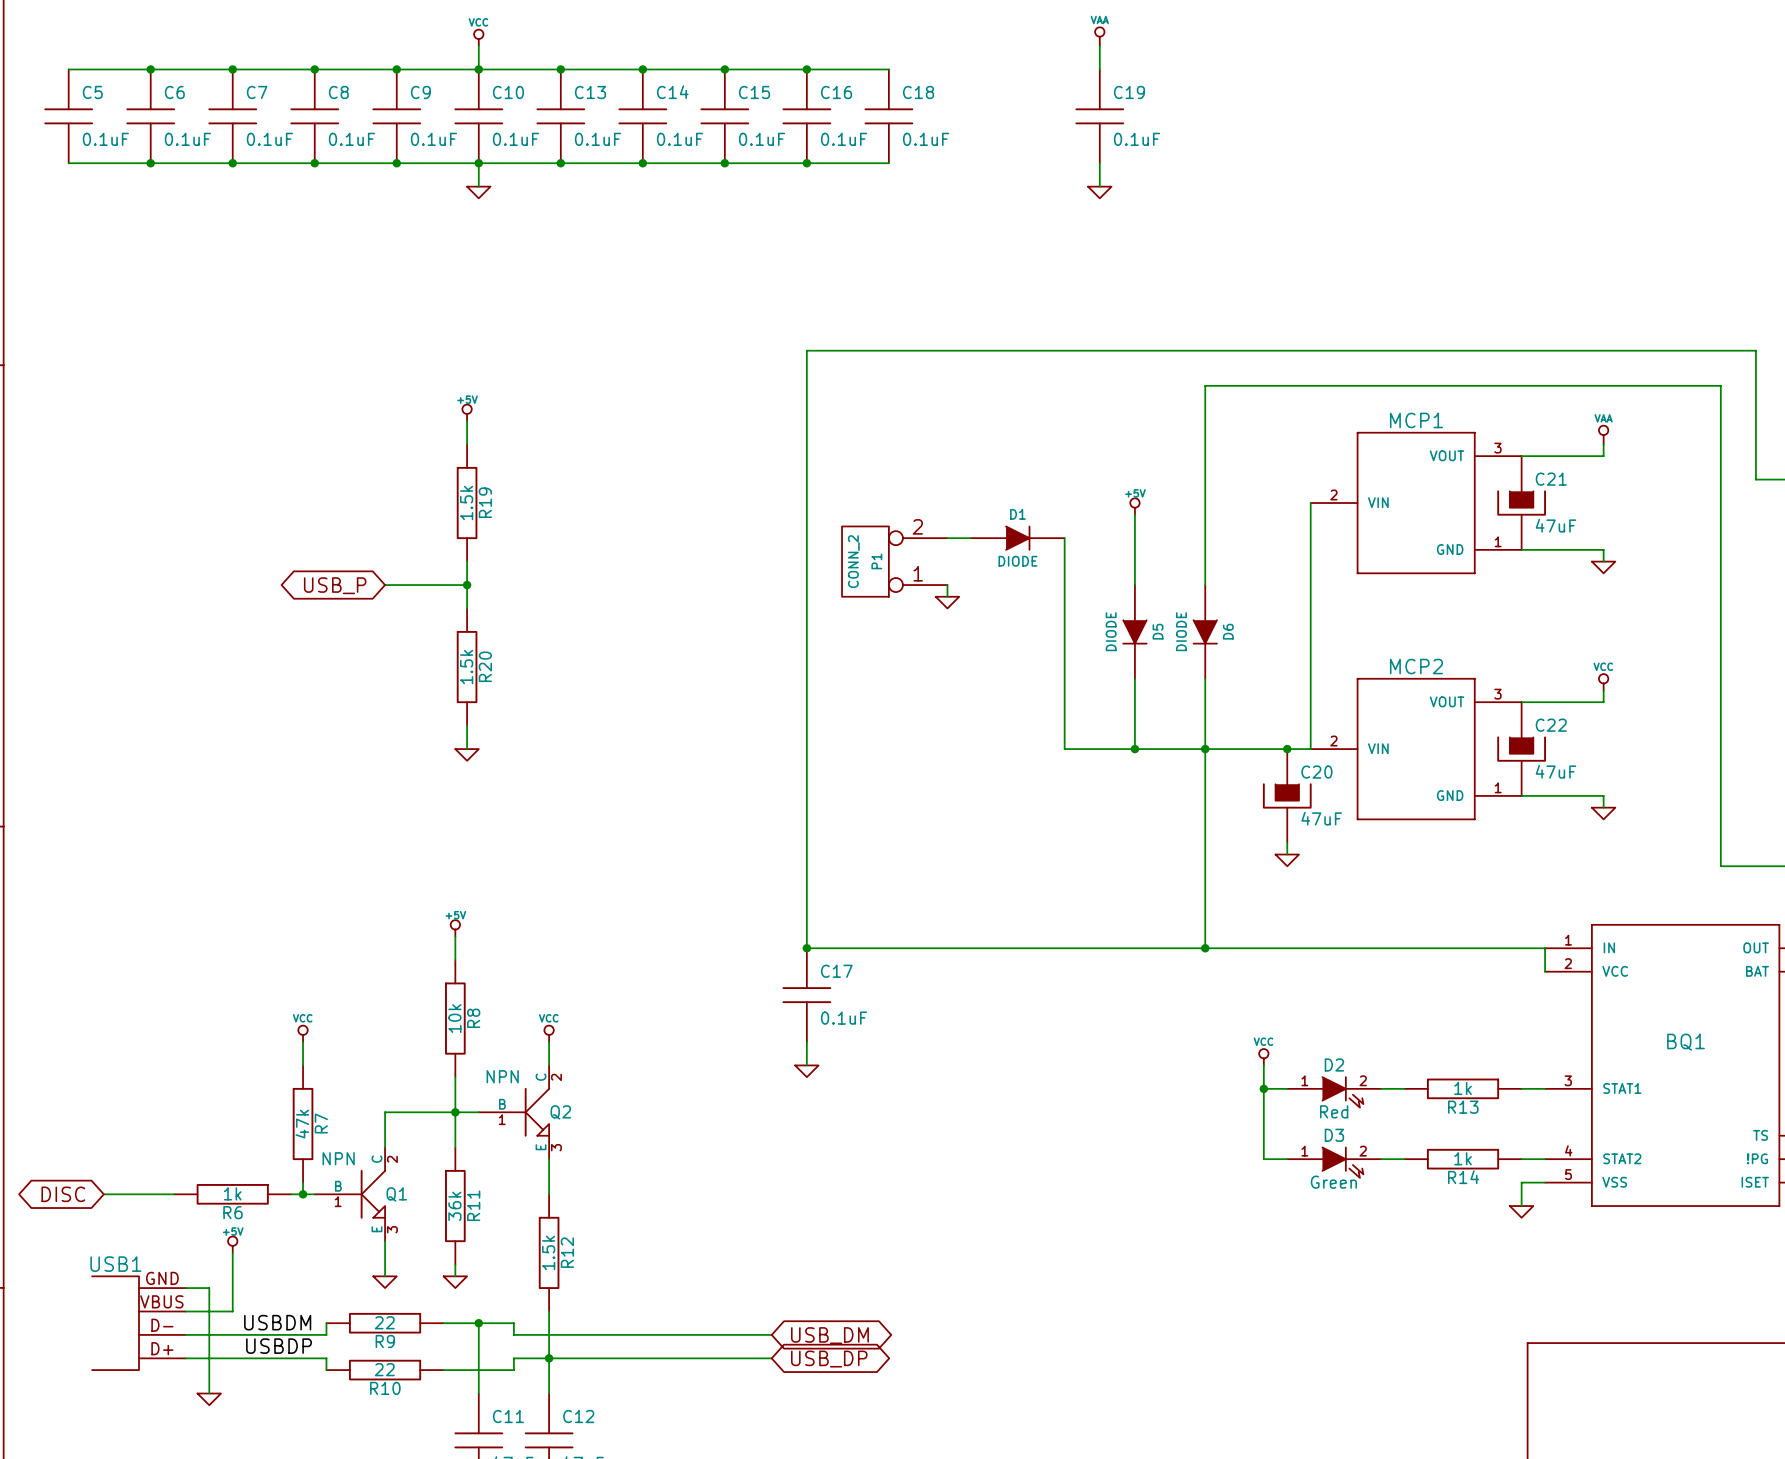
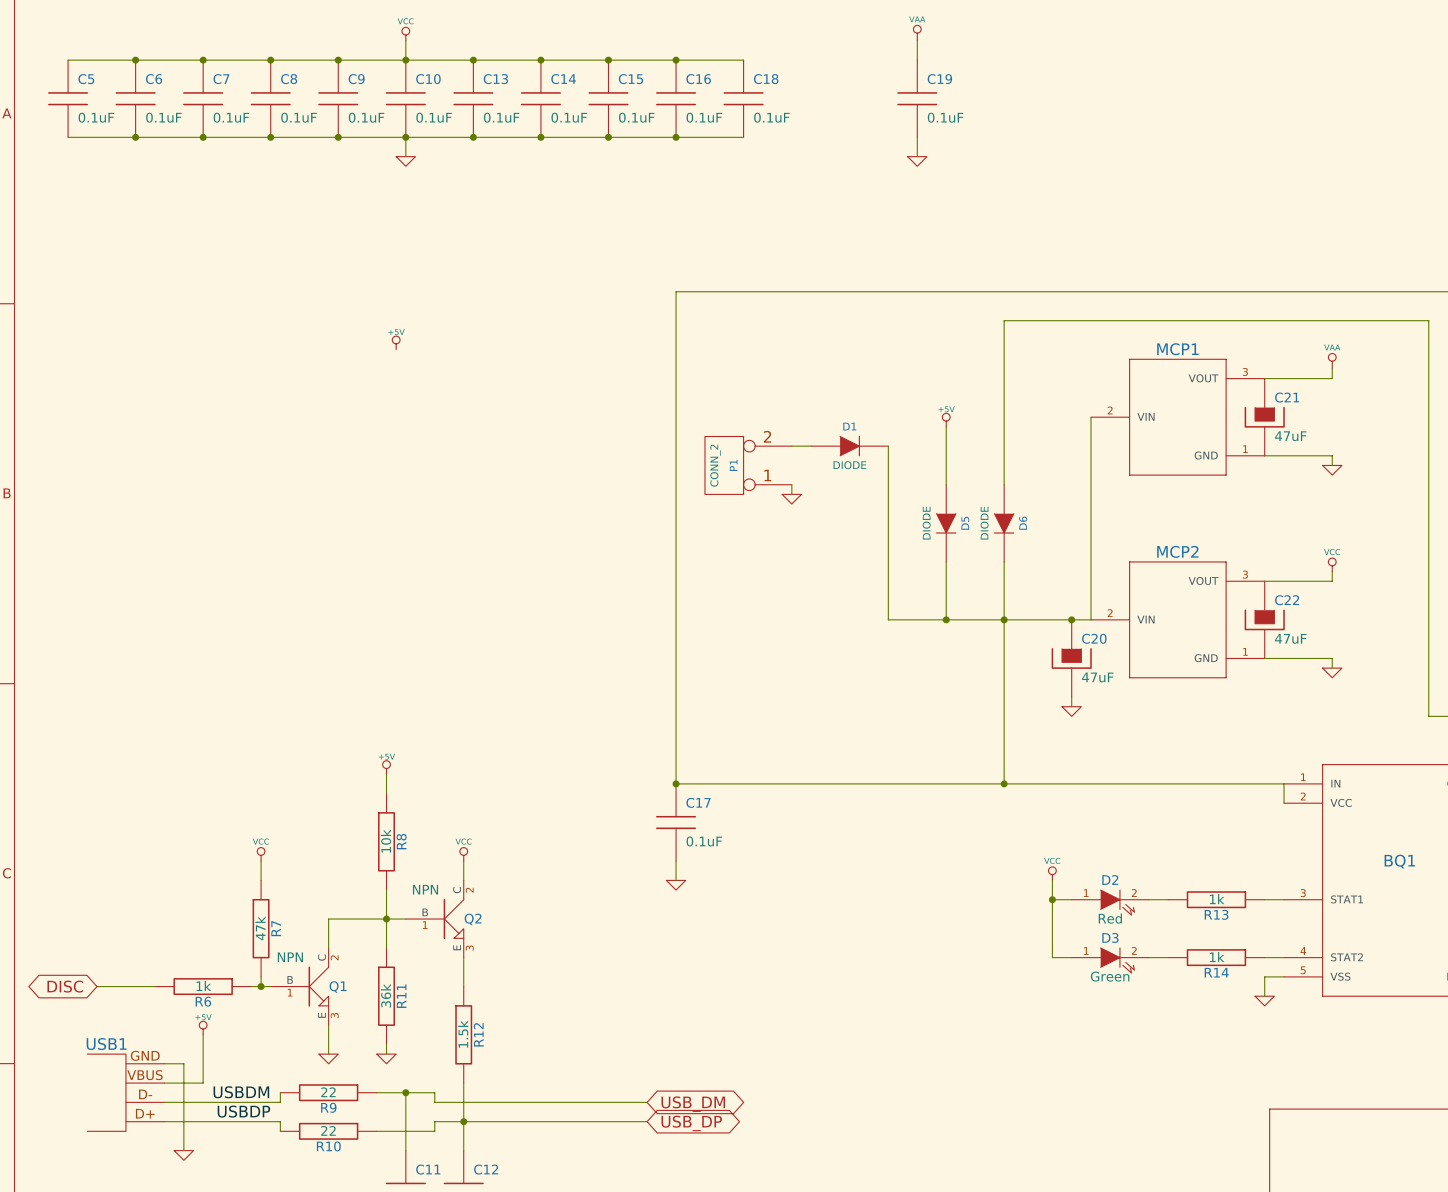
wire: (467, 420) (467, 444) -> none
R19: 1.5k (467, 503) -> none
wire: (467, 561) (467, 608) -> none
global label: USB_P (335, 585) -> none
wire: (385, 585) (467, 585) -> none
junction: (467, 585) -> none
R20: 1.5k (467, 667) -> none
wire: (467, 725) (467, 749) -> none
power symbol: (467, 754) -> none

